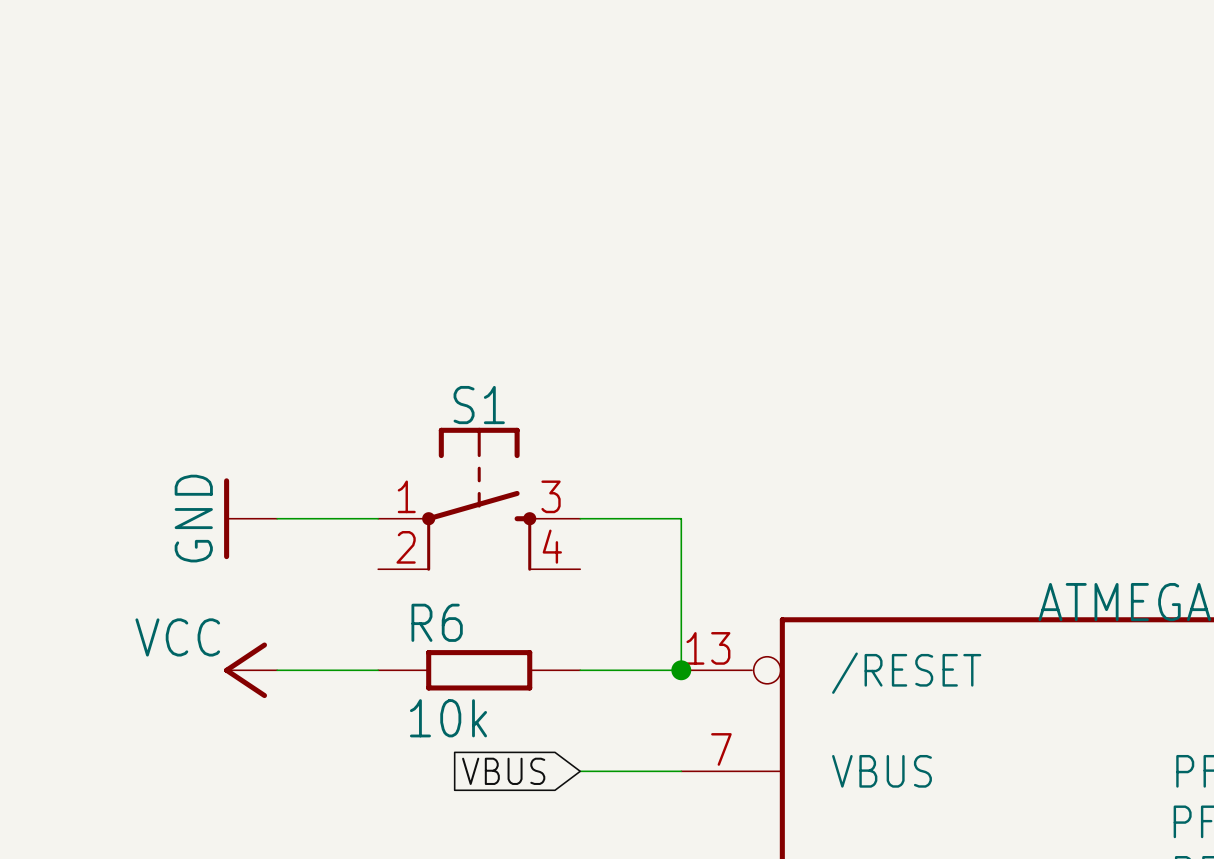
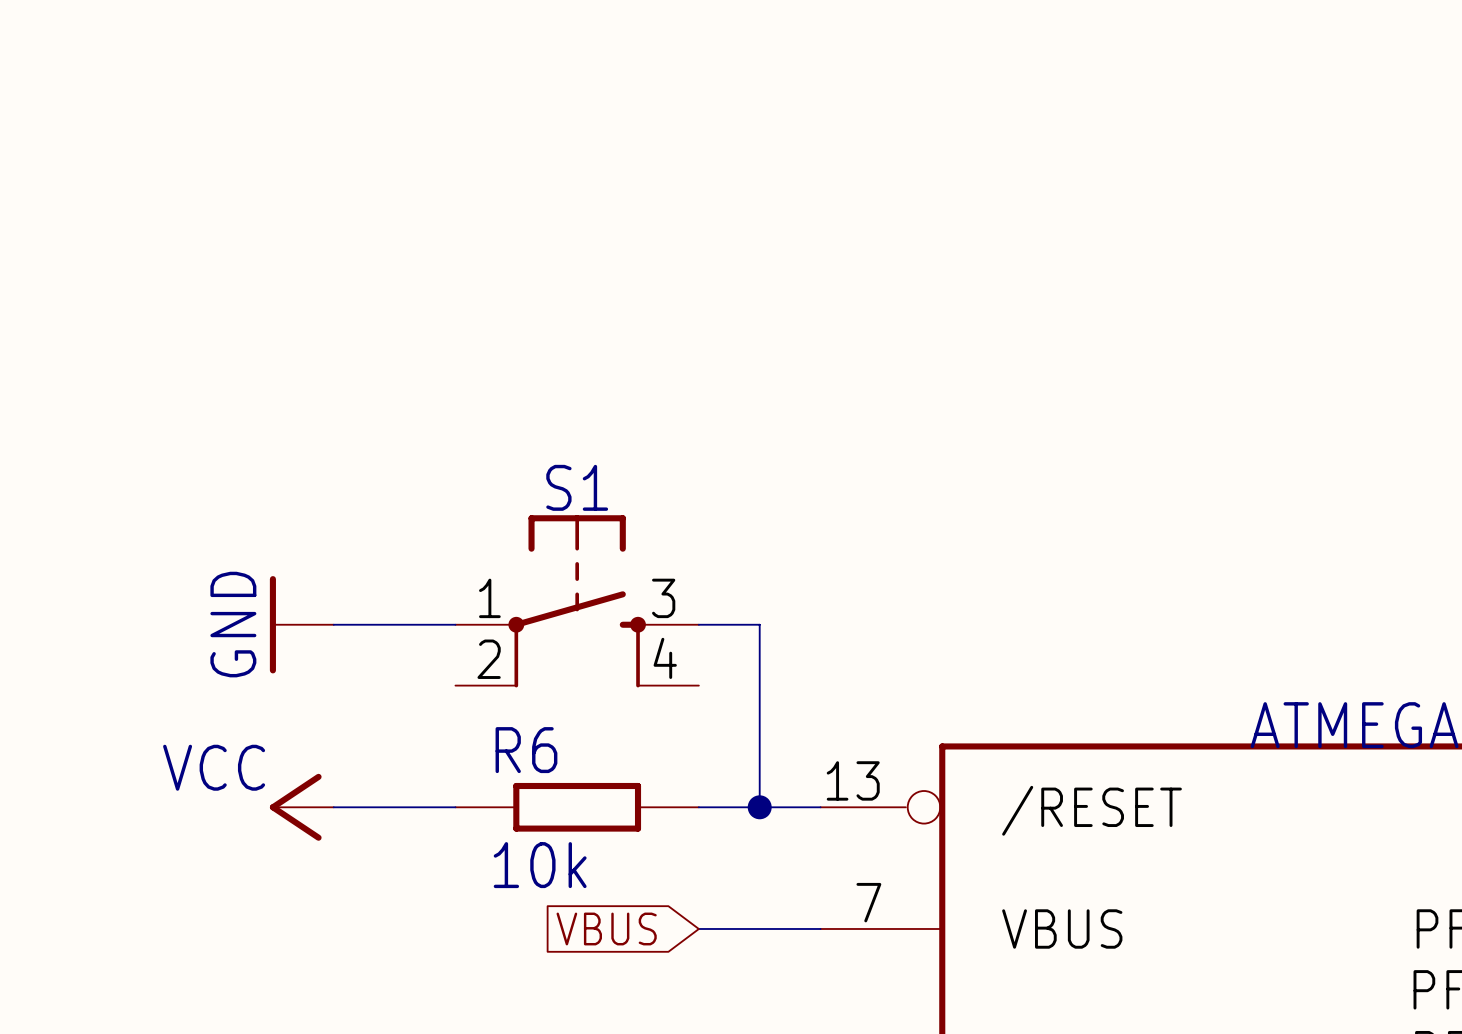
wire: (630, 518) (681, 518) (681, 670) -> (759, 624) (759, 807)
junction position: (681, 670) -> (759, 807)

